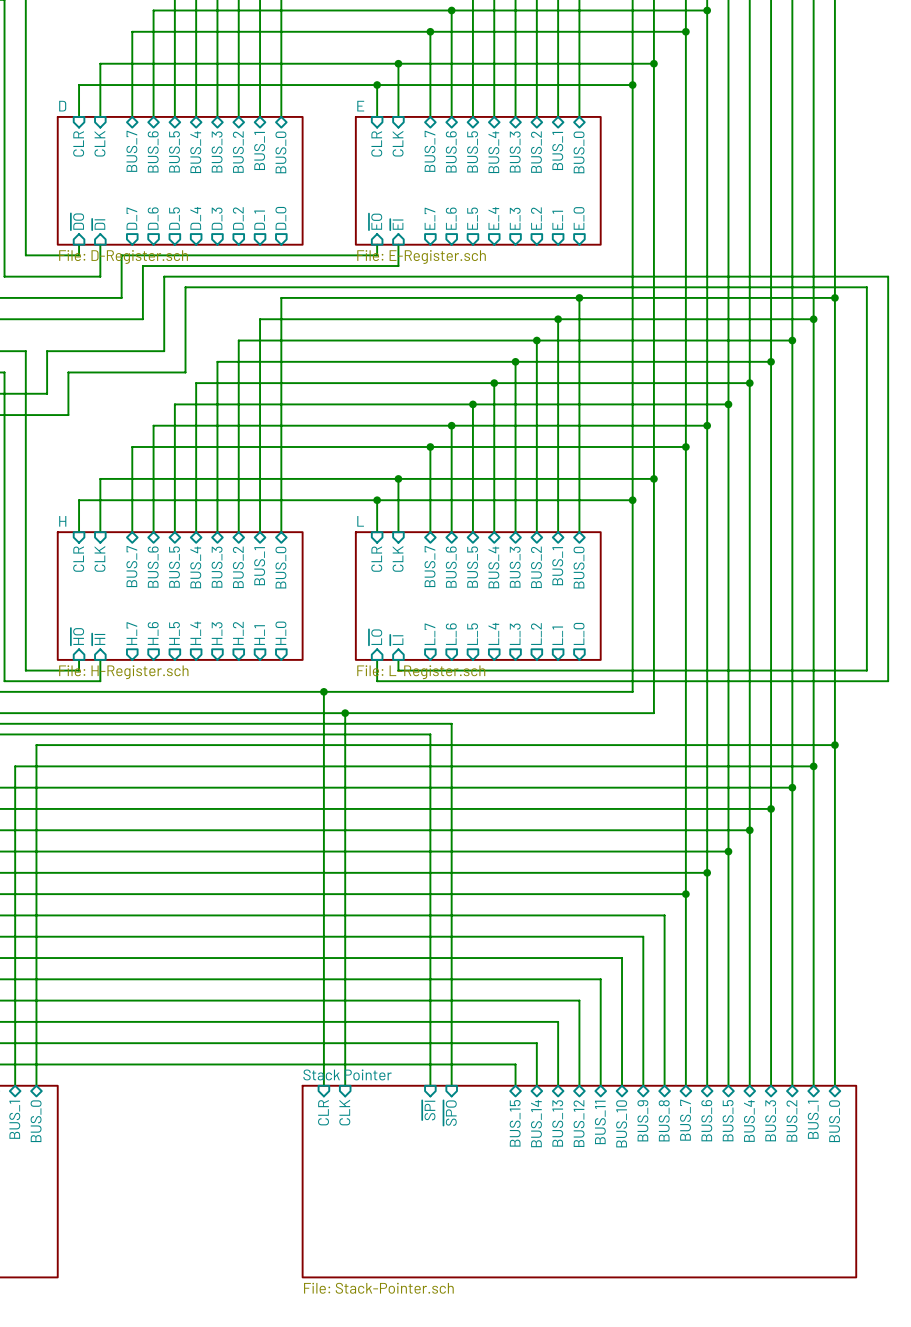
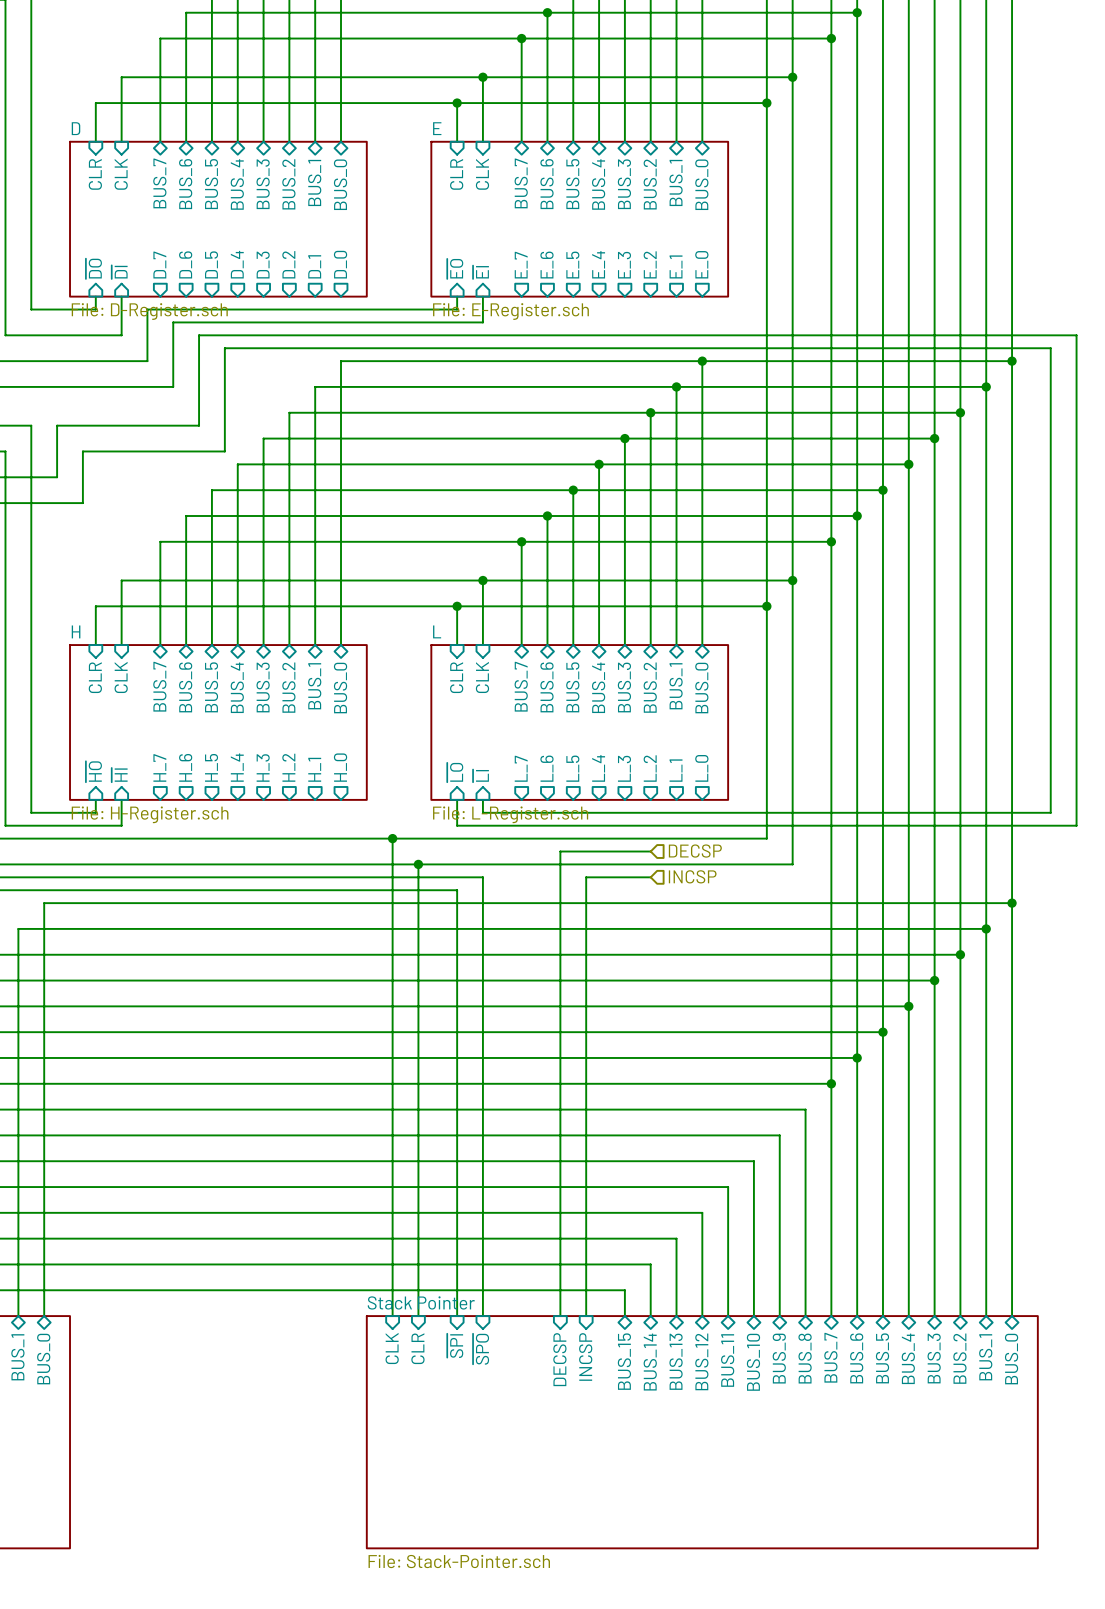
wire: none -> (650, 851) (560, 851) (560, 1316)
hierarchical label: none -> DECSP (695, 851)
wire: (398, 723) (451, 723) (451, 1085) -> (482, 877) (482, 1316)
wire: none -> (650, 877) (586, 877) (586, 1316)
hierarchical label: none -> INCSP (692, 876)
wire: (377, 734) (430, 734) (430, 1085) -> (457, 890) (457, 1316)
sheet pin position: ~{SPI} (428, 1110) -> ~{SPI} (455, 1345)
sheet pin: CLR (323, 1112) -> CLK (392, 1348)
sheet pin: CLK (344, 1112) -> CLR (417, 1348)
sheet pin position: ~{SPO} (450, 1113) -> ~{SPO} (481, 1349)
sheet pin: none -> INCSP (585, 1356)
sheet pin: none -> DECSP (559, 1359)

